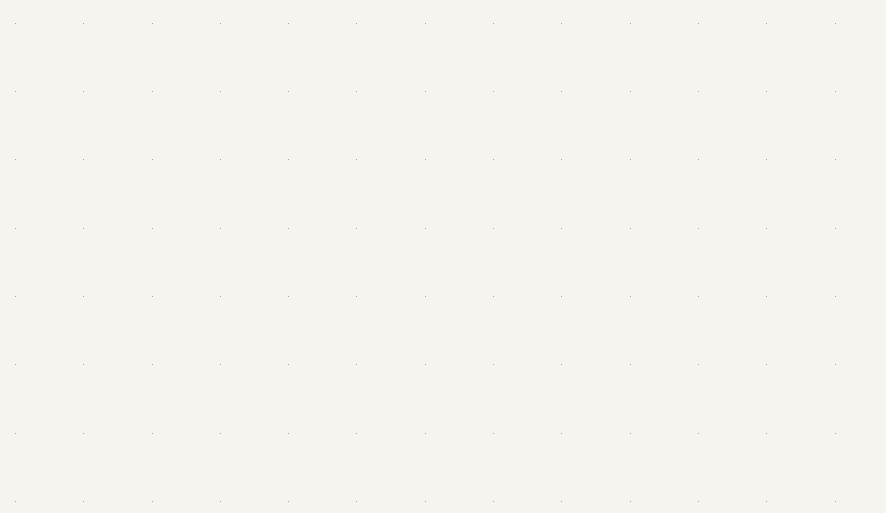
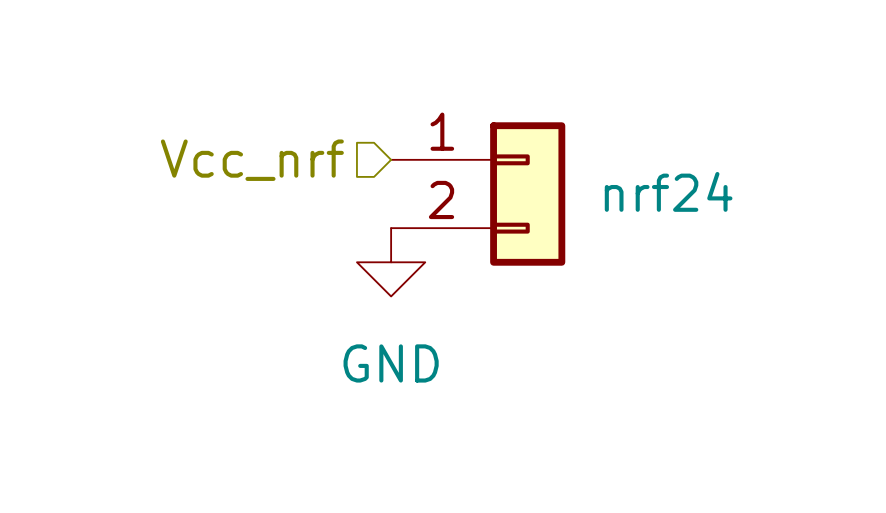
hierarchical label: none -> Vcc_nrf (252, 160)
nrf24: none -> (478, 193)
power symbol: none -> GND (391, 262)

